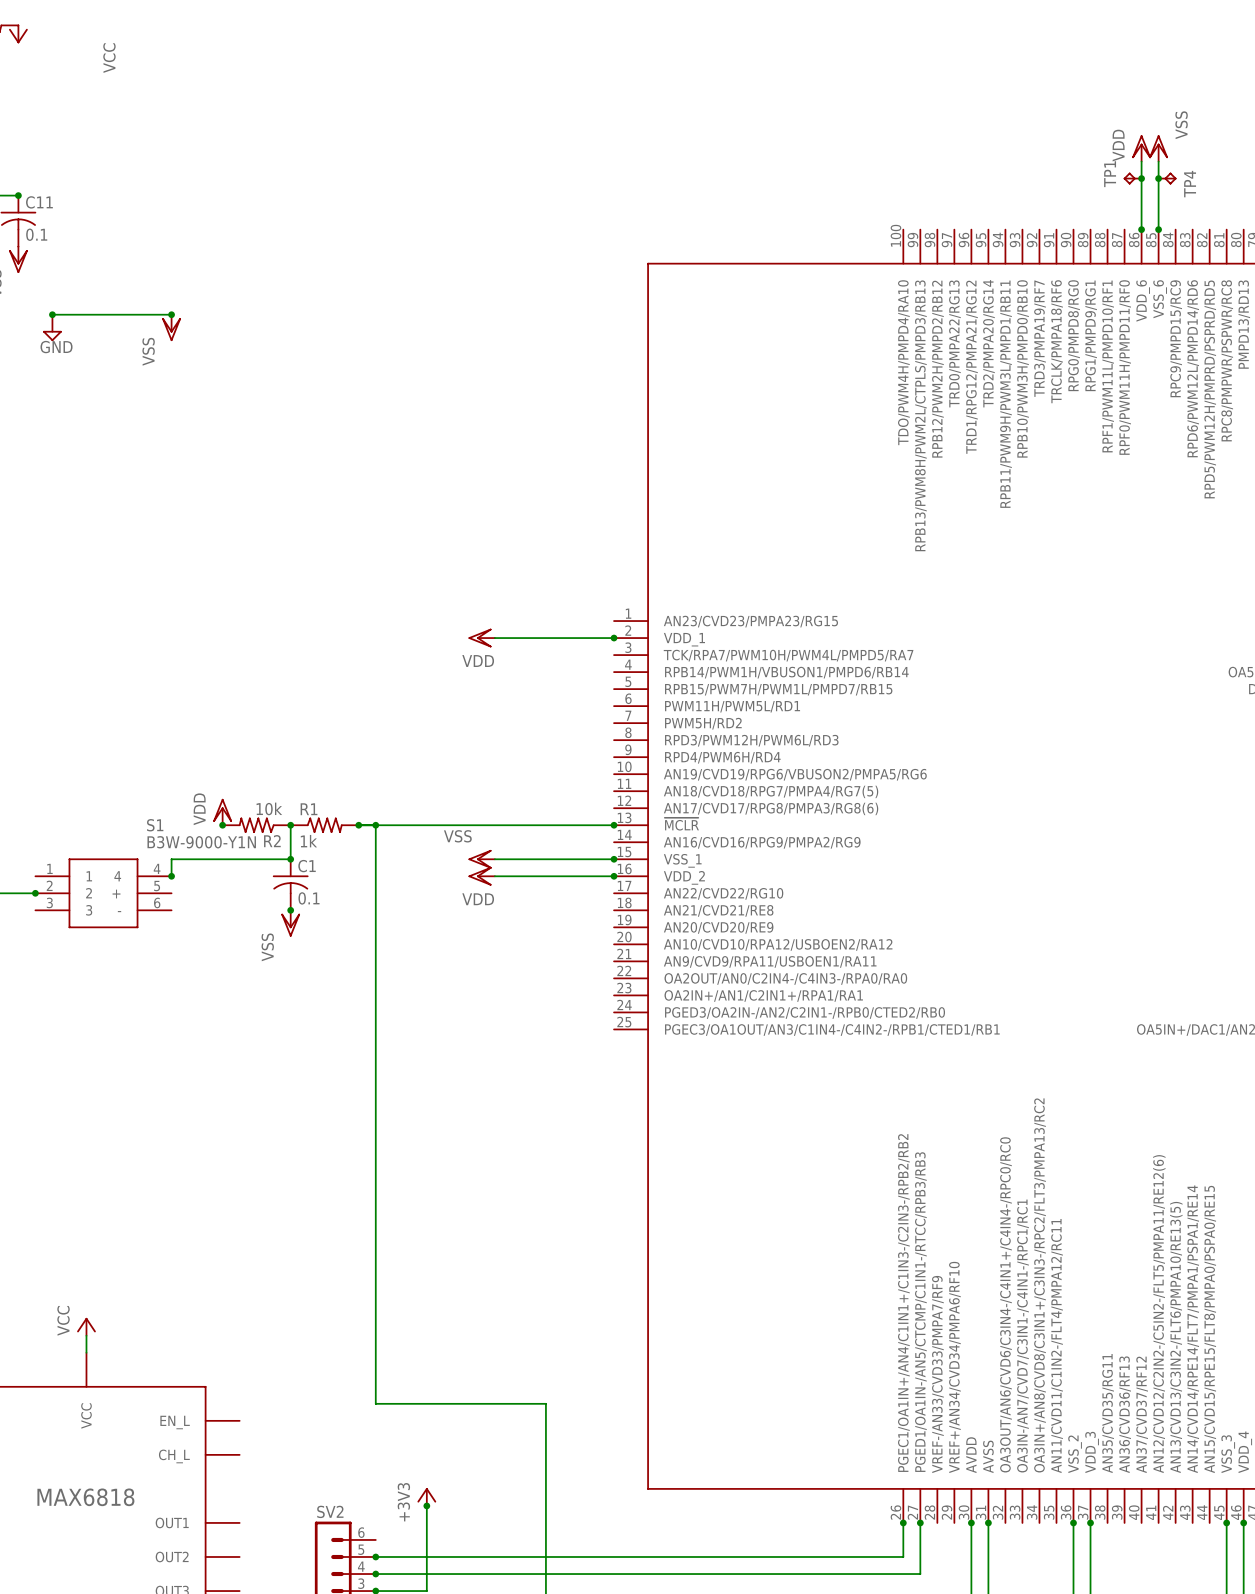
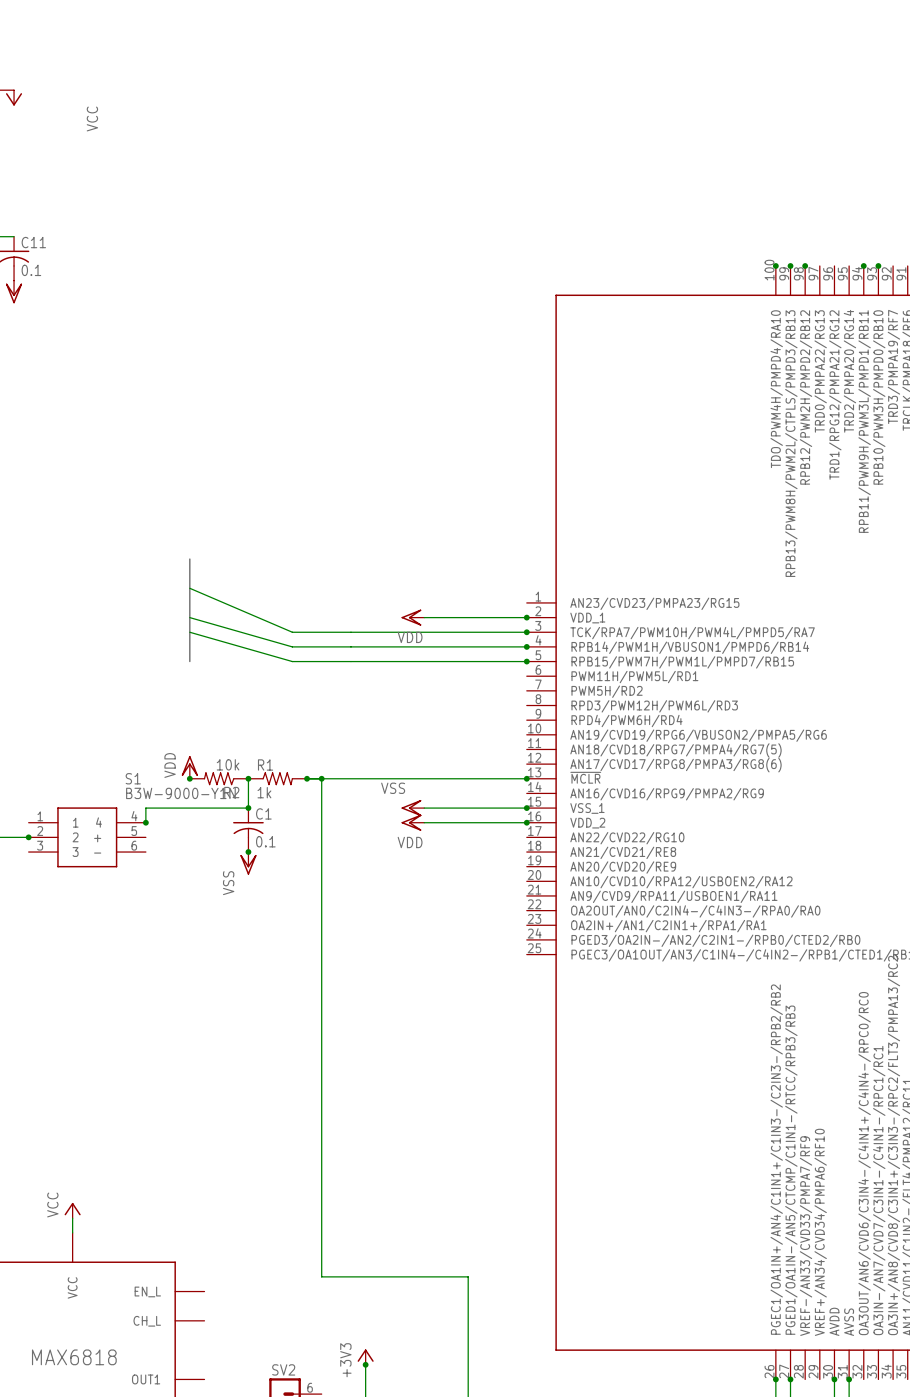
junction: (18, 195) -> none
junction: none -> (775, 265)
junction: none -> (790, 265)
junction: none -> (805, 265)
junction: none -> (863, 265)
junction: none -> (878, 265)
wire: (52, 314) (171, 314) -> none
junction: (52, 314) -> none
junction: (171, 314) -> none
power symbol: GND (52, 327) -> none
power symbol: VSS (171, 327) -> none
bus: none -> (189, 559) (189, 661)
wire: none -> (189, 588) (292, 632) (526, 632)
wire: none -> (189, 617) (292, 646) (526, 646)
wire: none -> (189, 632) (292, 661) (526, 661)
junction: none -> (526, 632)
junction: none -> (526, 646)
junction: none -> (526, 661)

